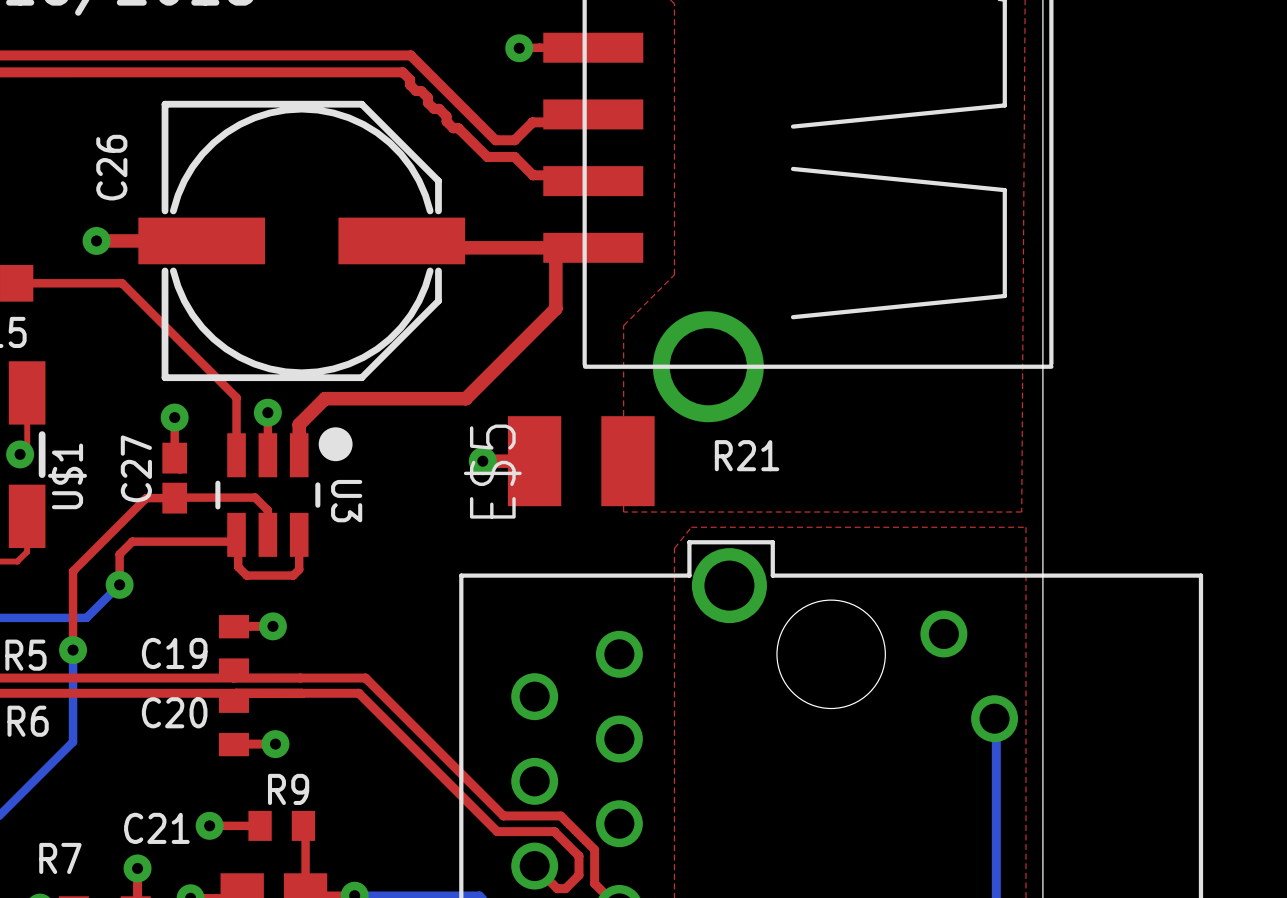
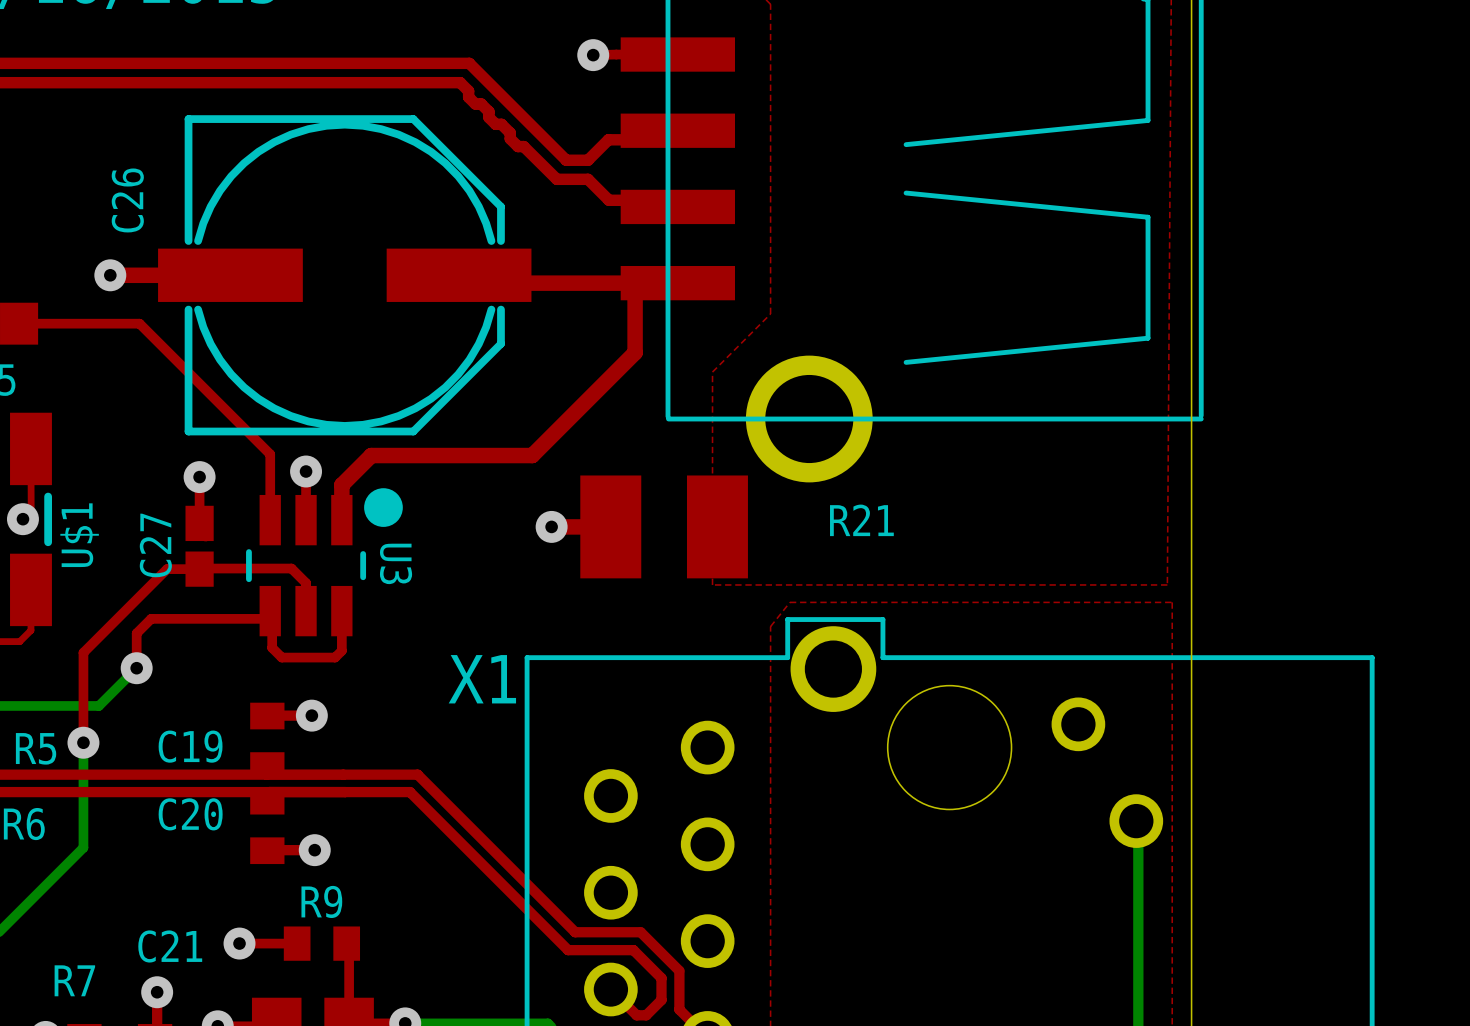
E$5 name: E$5 (492, 471) -> X1 (482, 679)

